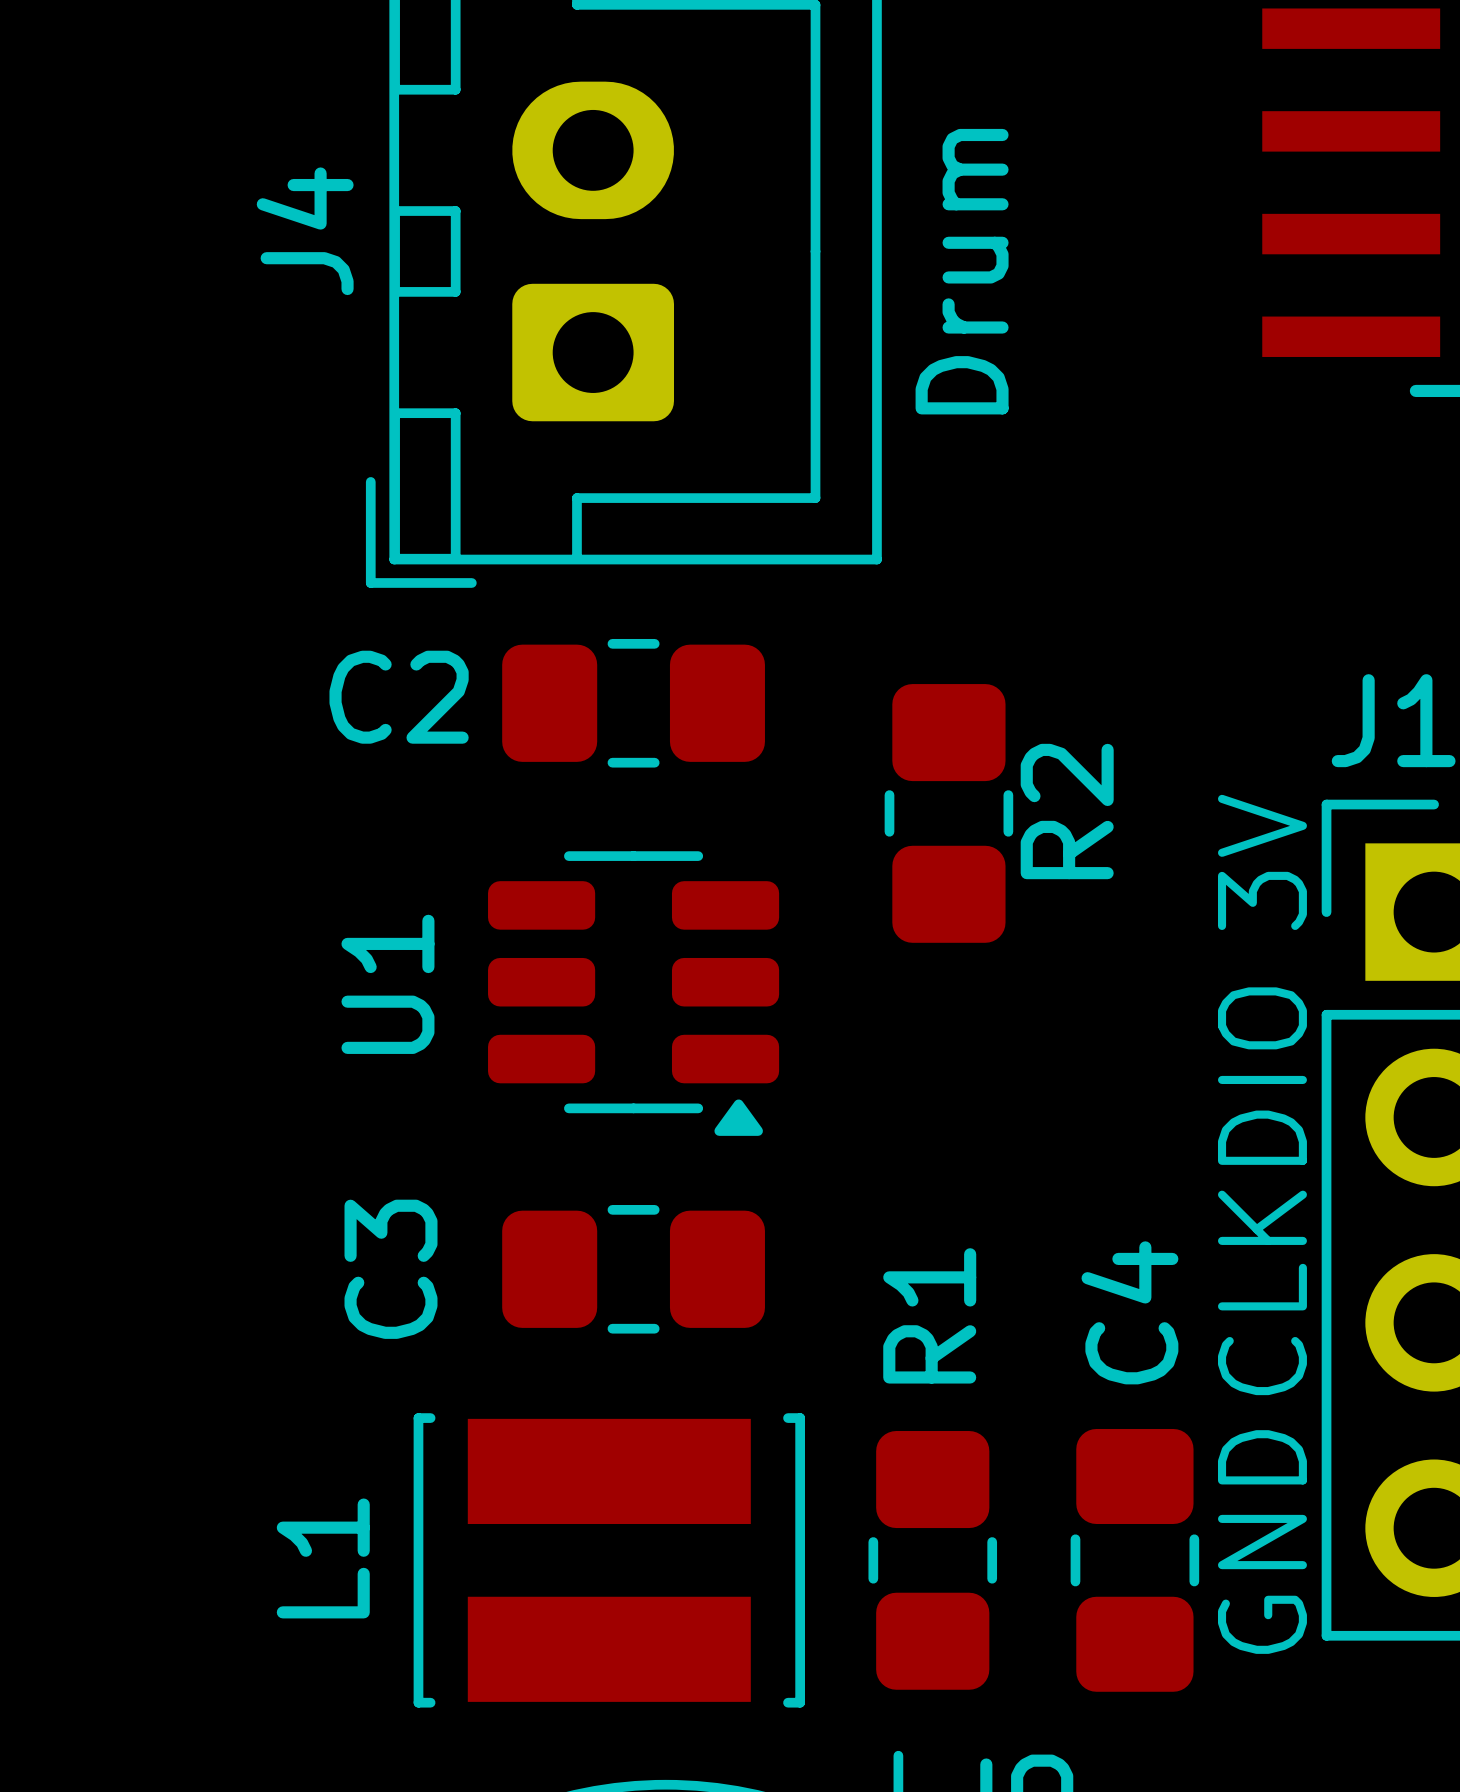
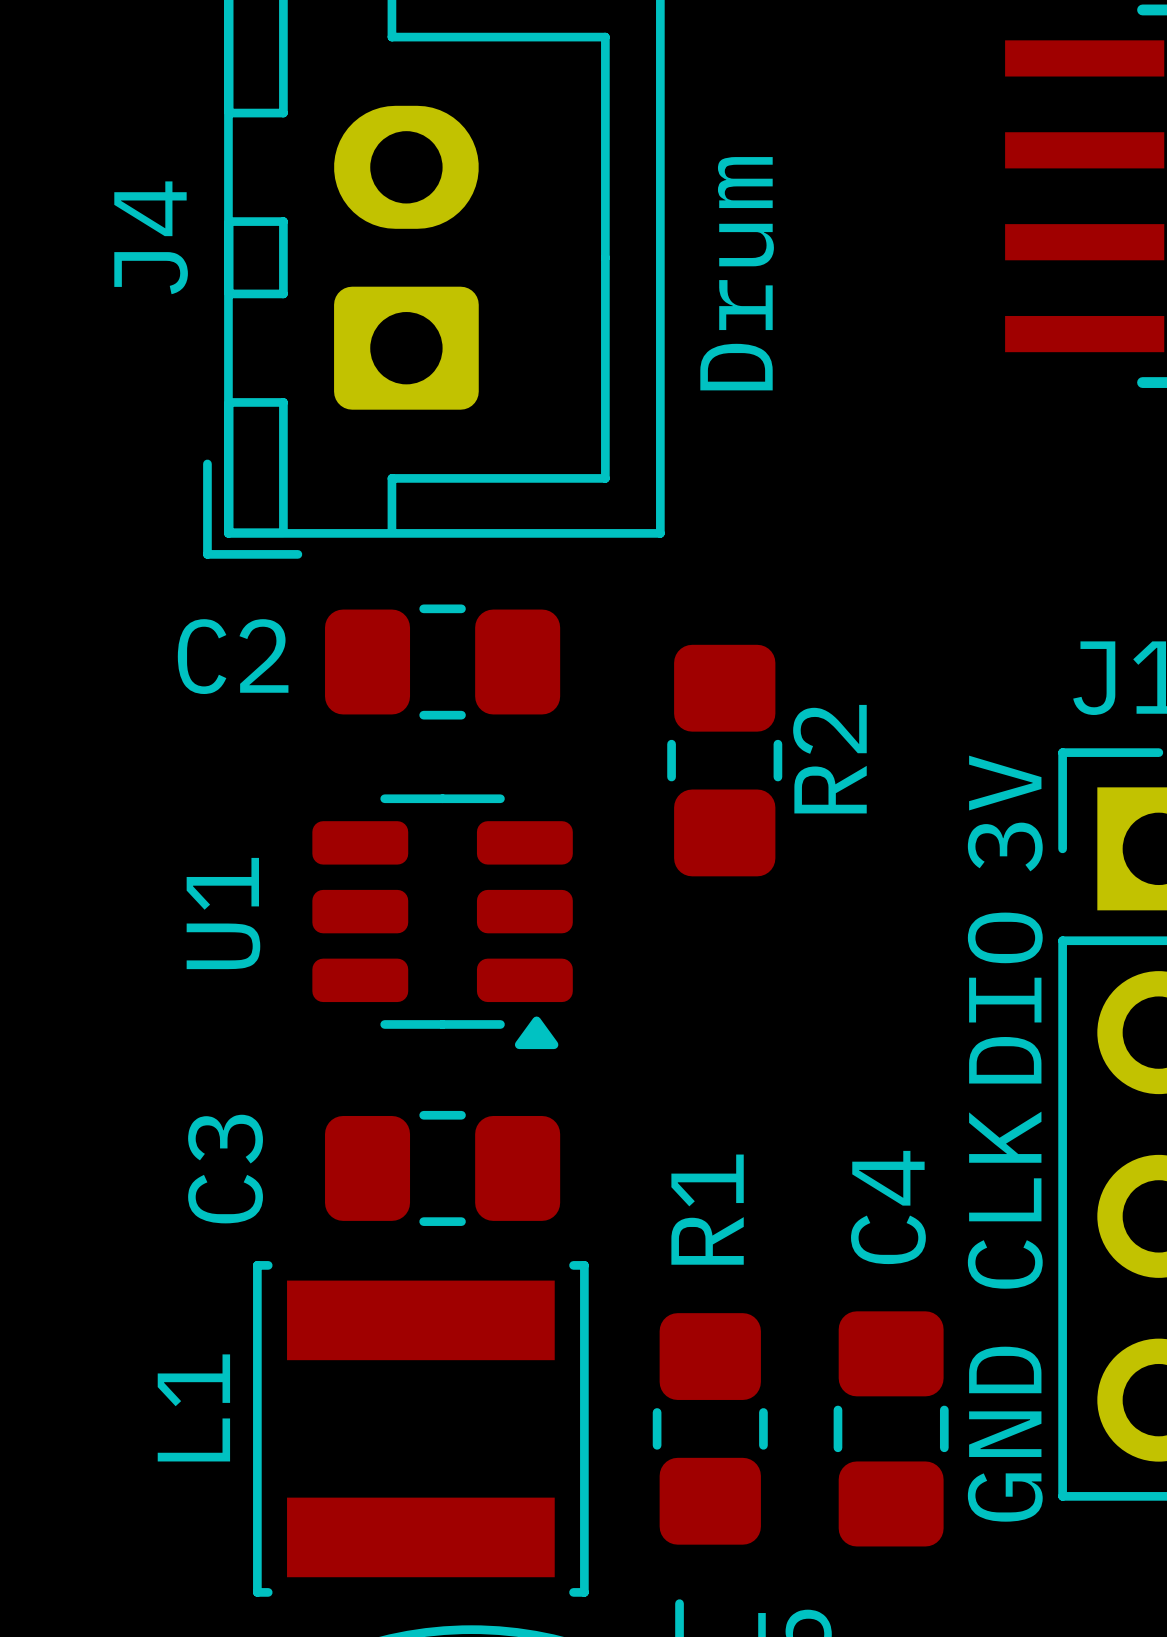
L1 footprint: [413, 1413, 805, 1708] -> [253, 1261, 589, 1597]
L1 name position: L1 (323, 1558) -> L1 (193, 1407)

